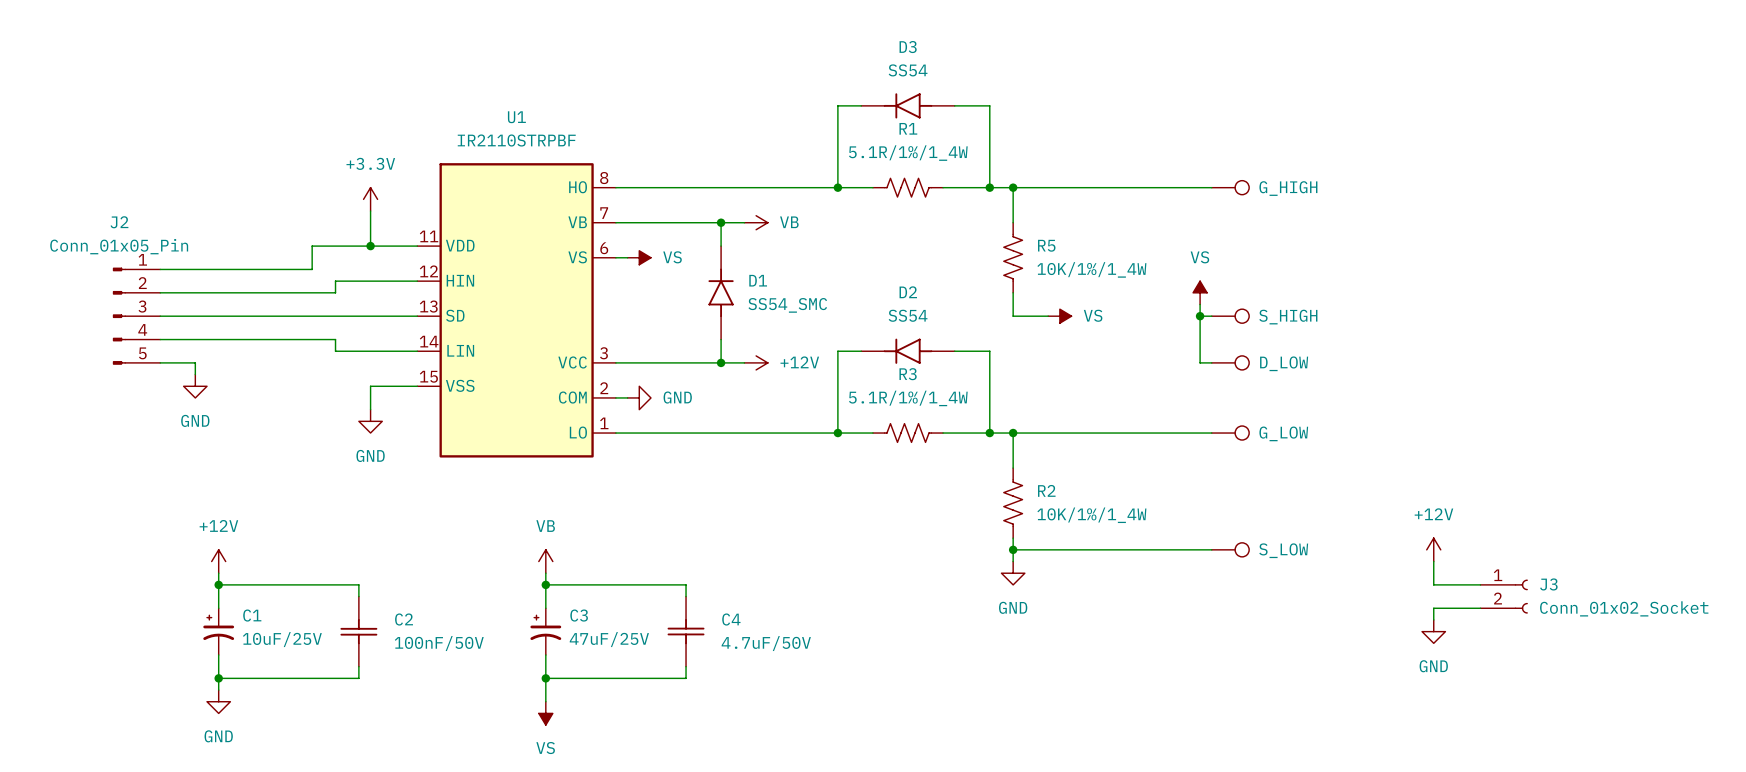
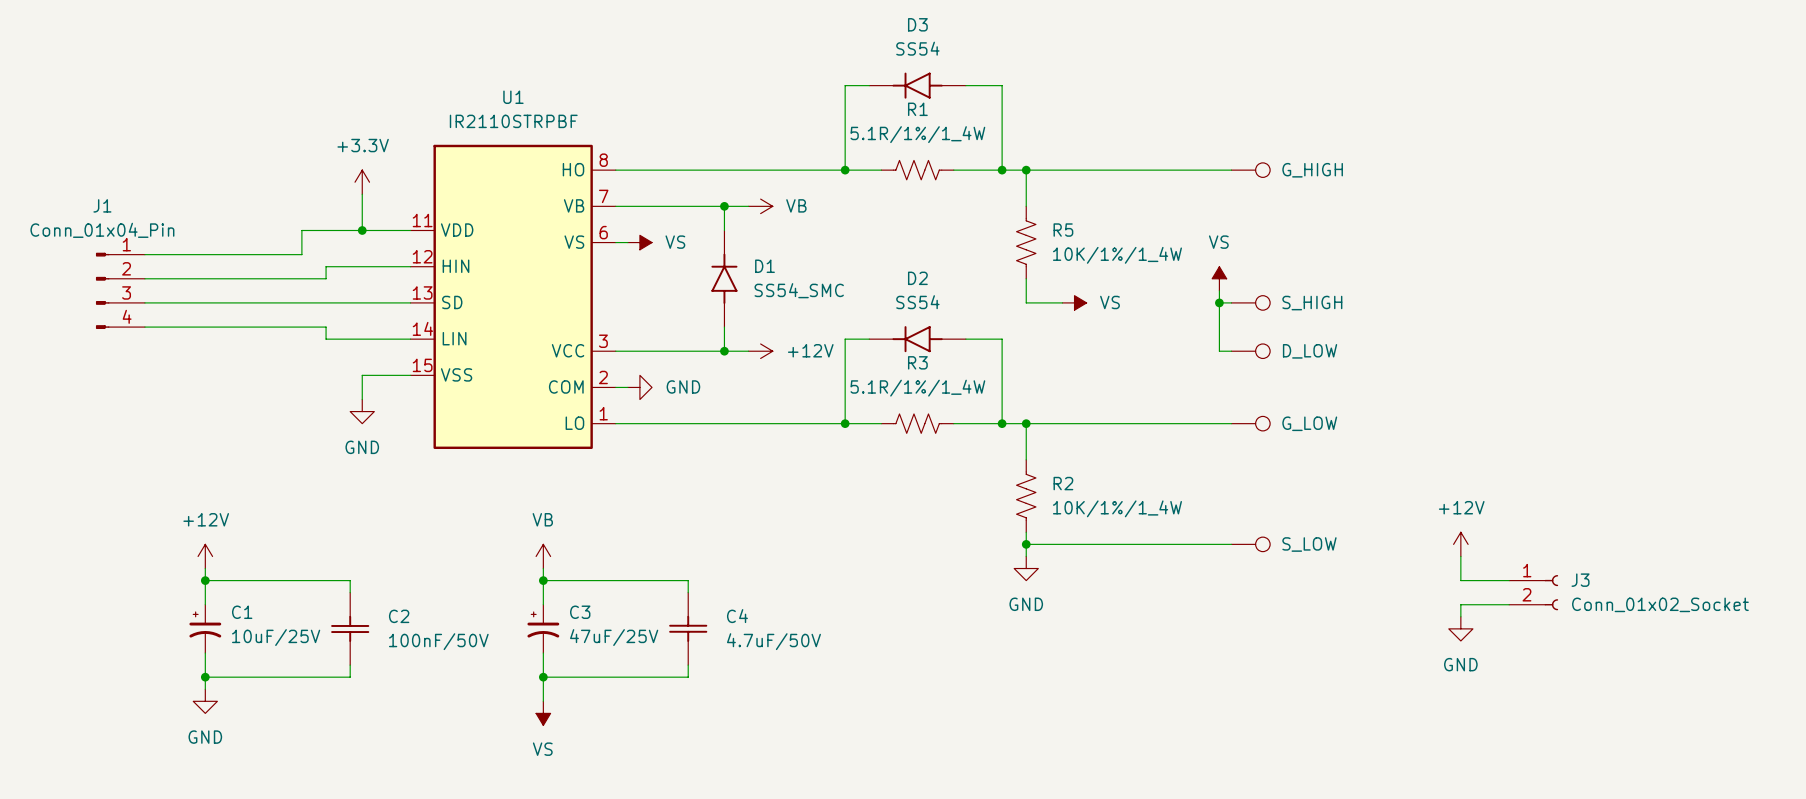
J1: none -> Conn_01x04_Pin (120, 290)
J2: Conn_01x05_Pin (136, 316) -> none
wire: (160, 362) (195, 362) (195, 374) -> none
power symbol: GND (195, 386) -> none

